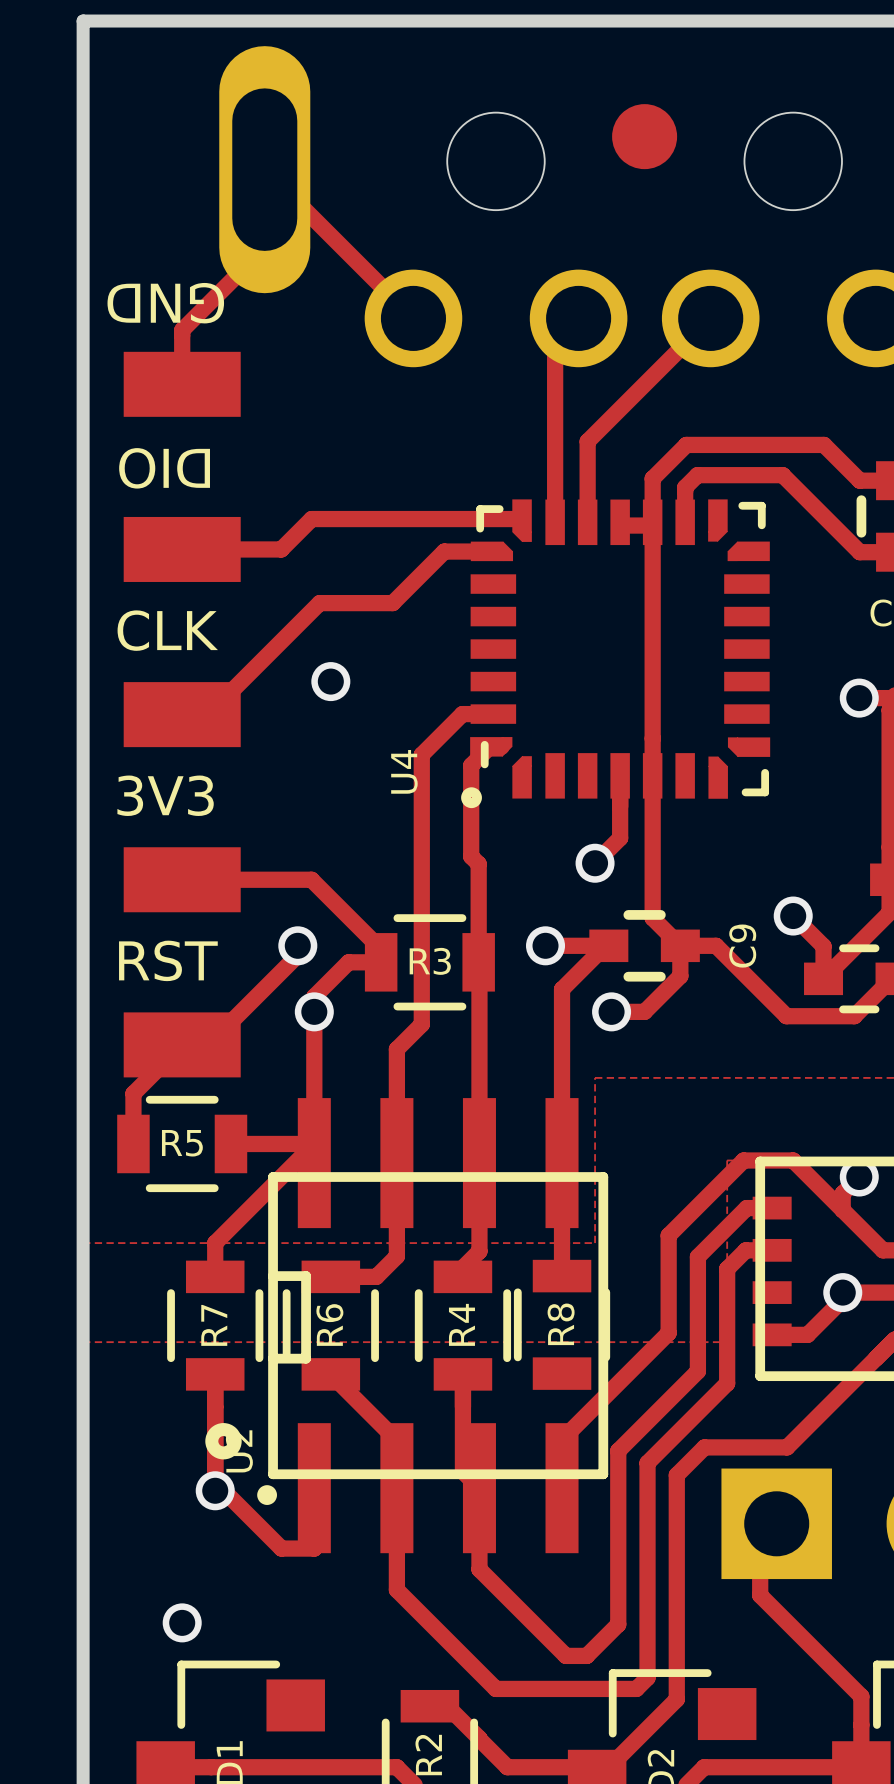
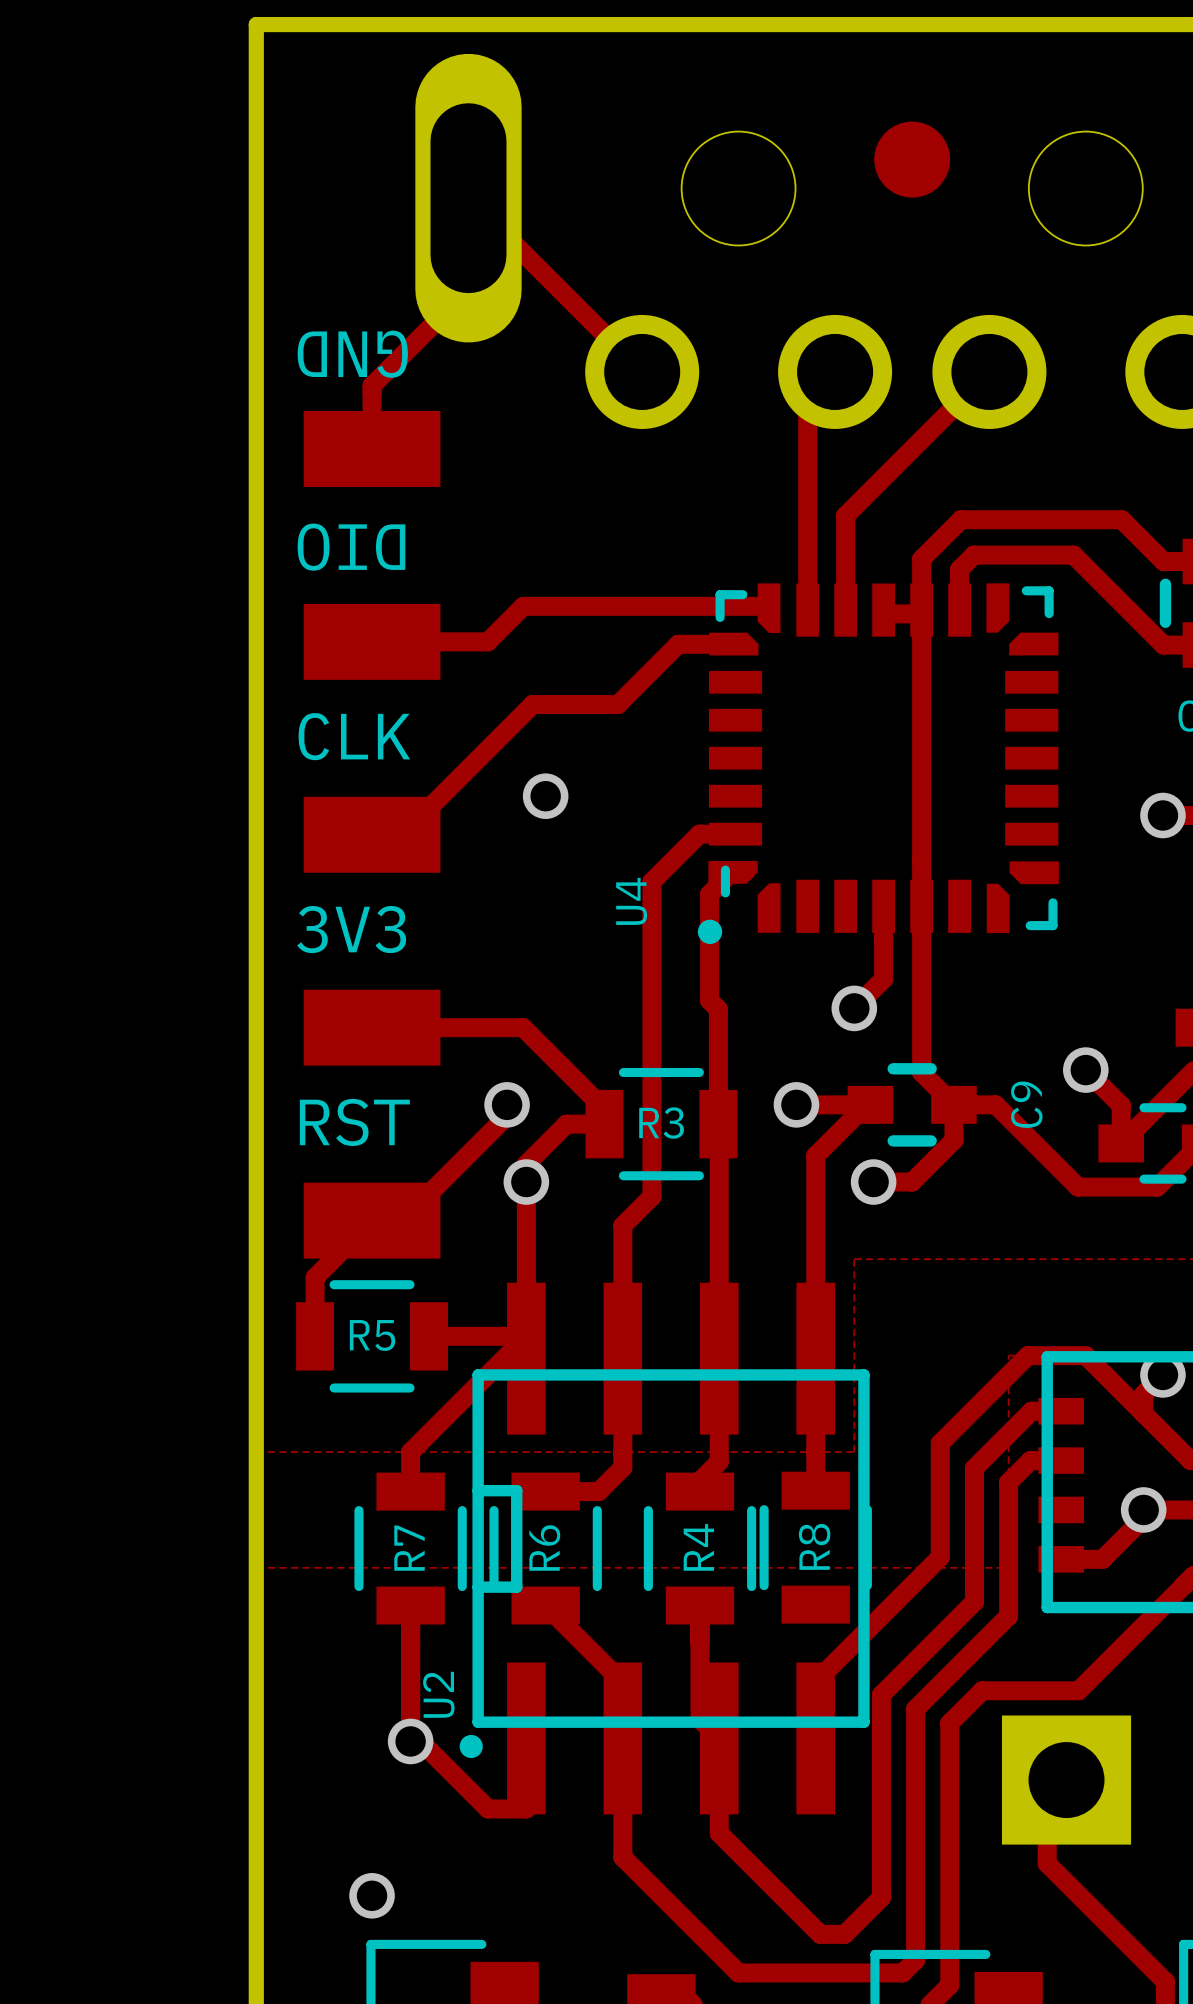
drawing: [205, 1423, 242, 1460] -> none

